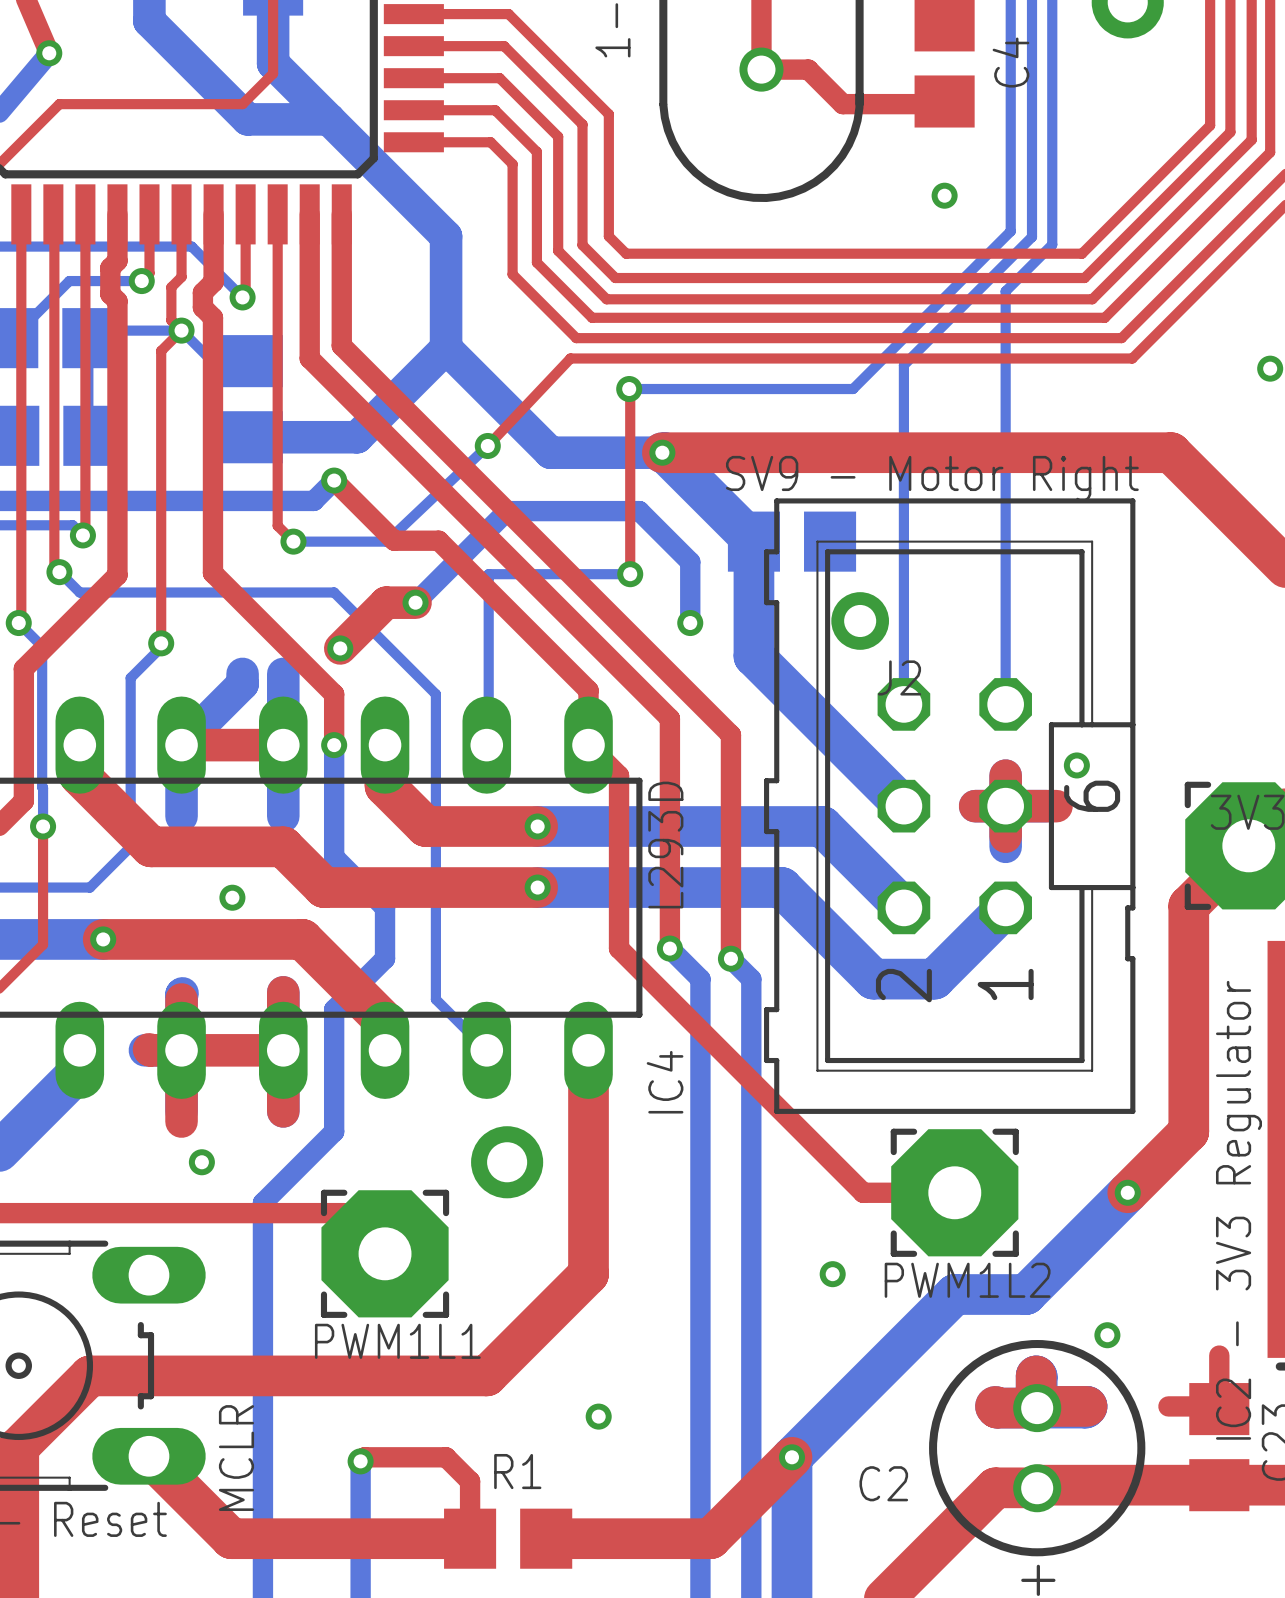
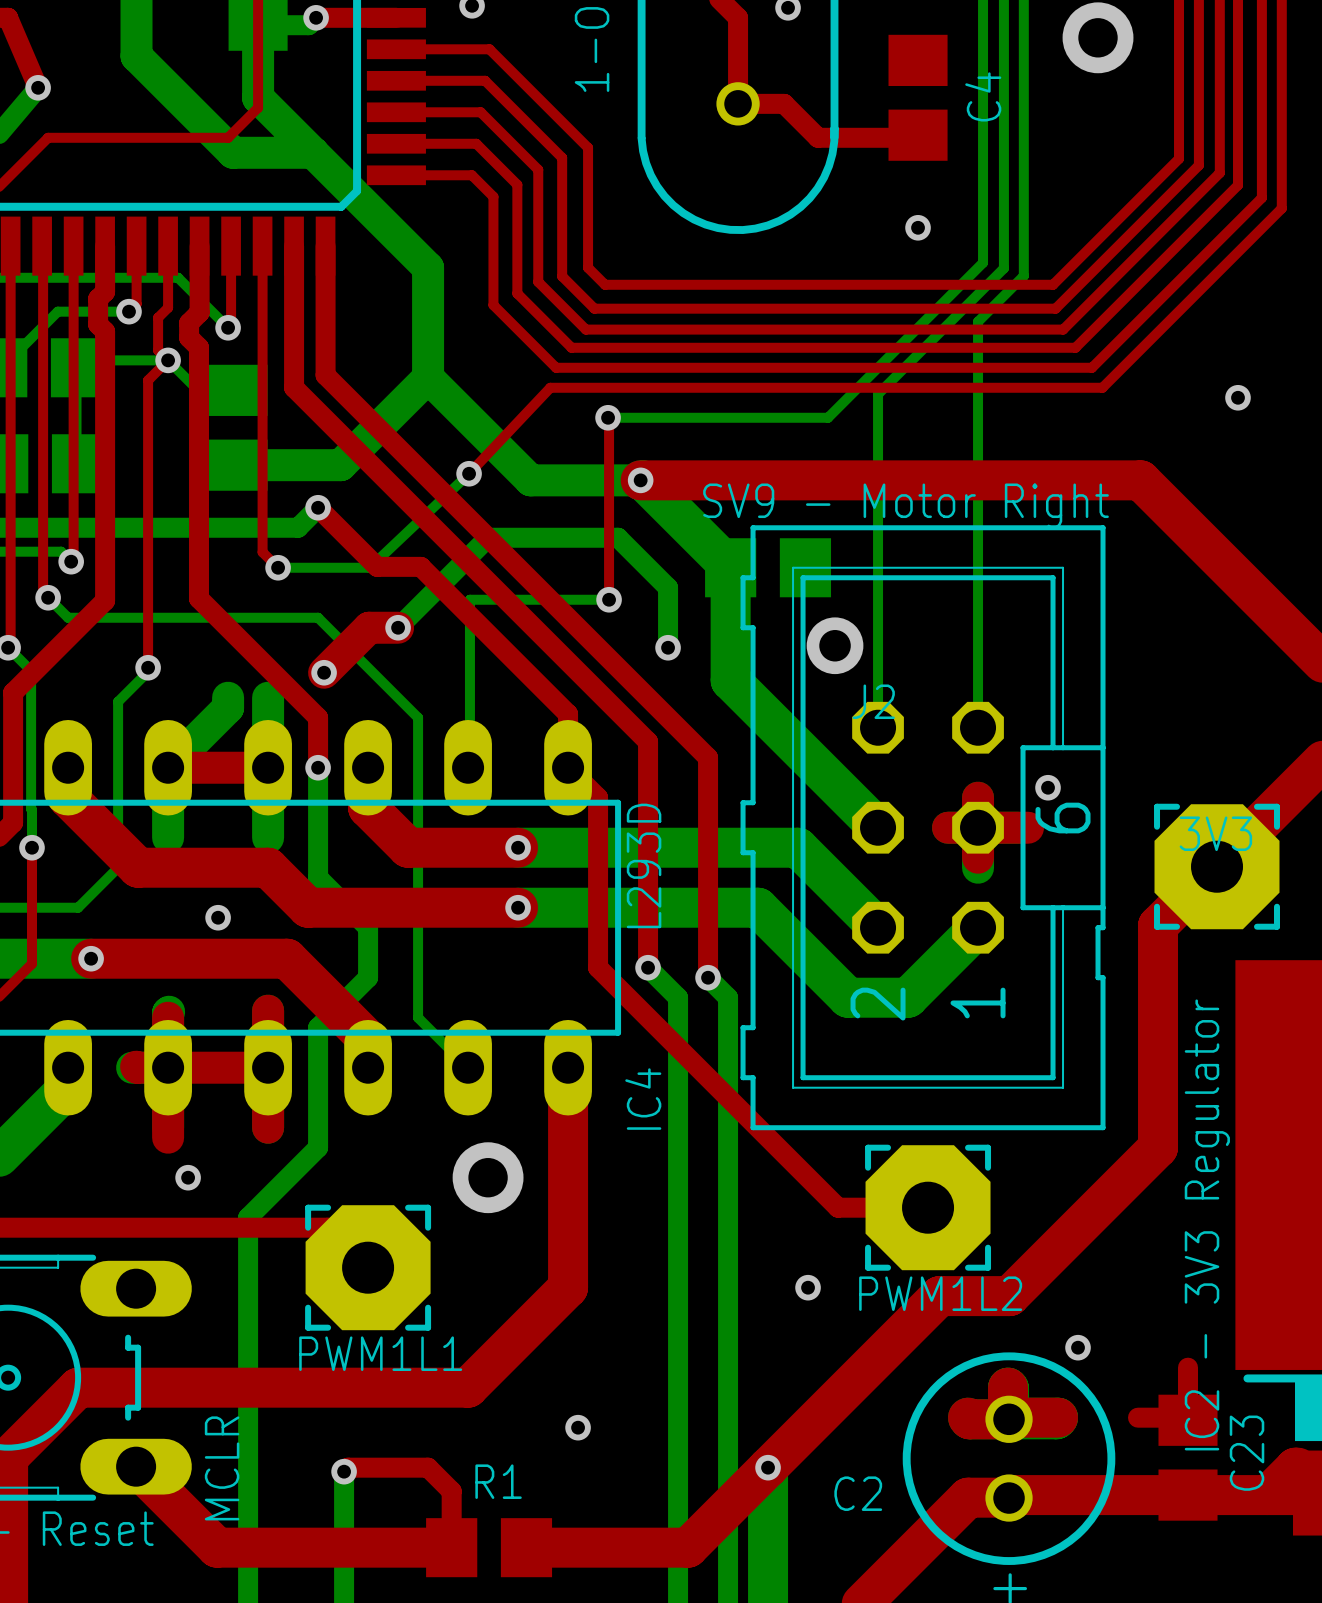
top track: none -> (1098, 1207) (1009, 1296) (939, 1296) (768, 1467)
bottom track: (1127, 1192) (1026, 1294) (954, 1294) (791, 1457) -> none
via: (1127, 1192) -> none

